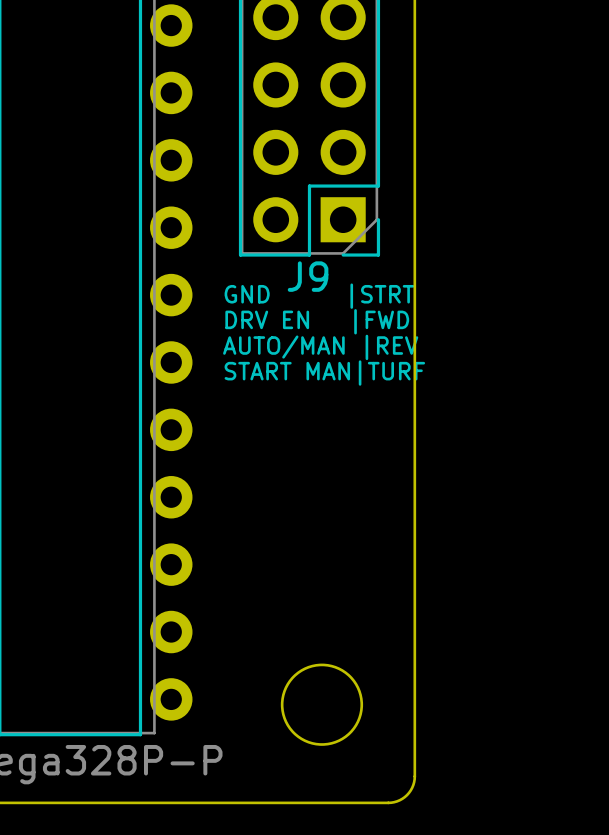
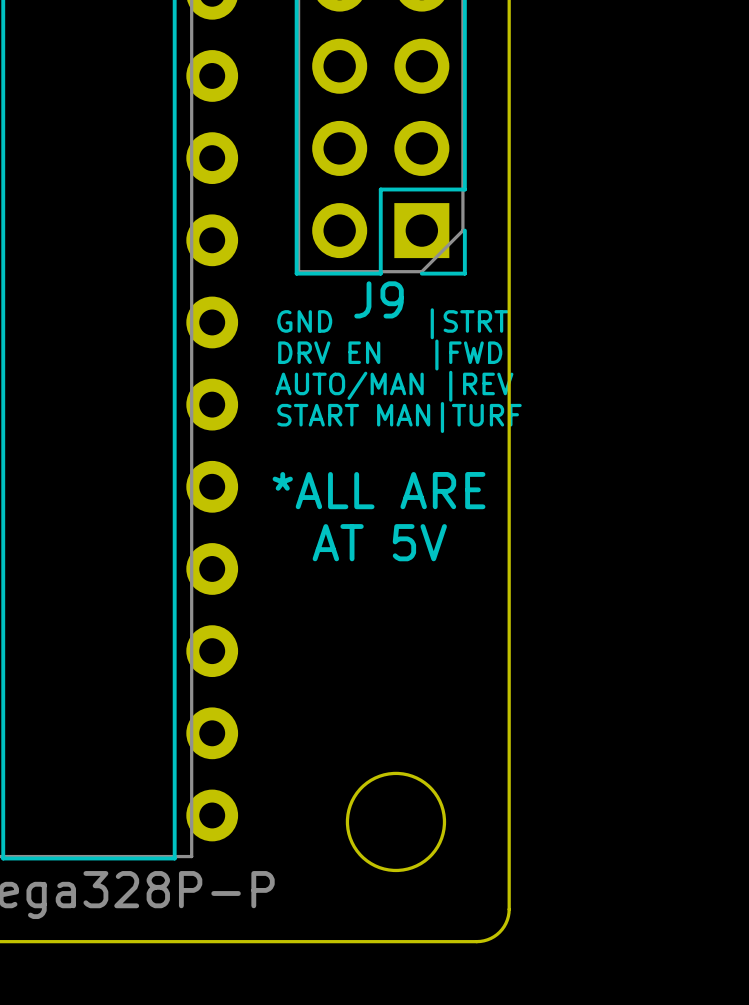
text: none -> *ALL ARE (379, 490)
text: none -> AT 5V (379, 542)

